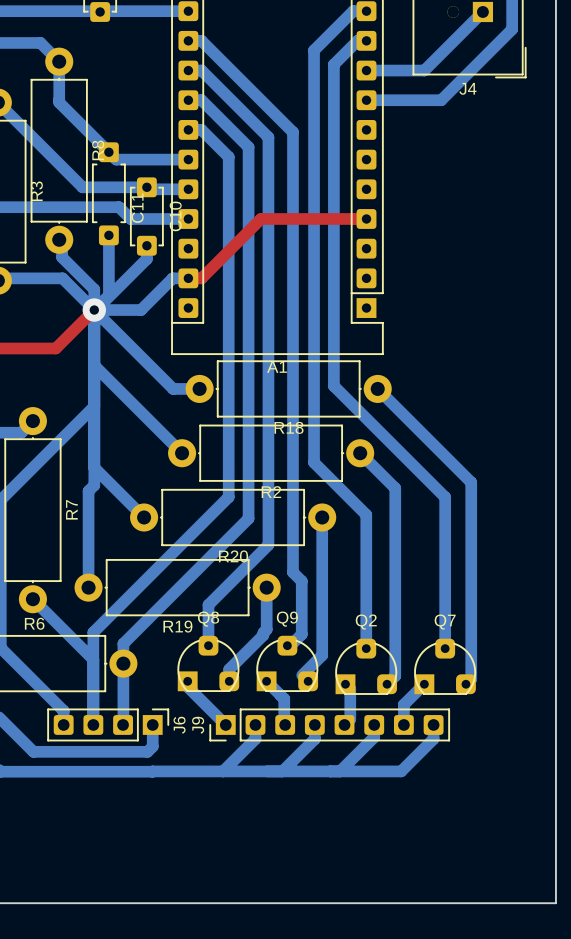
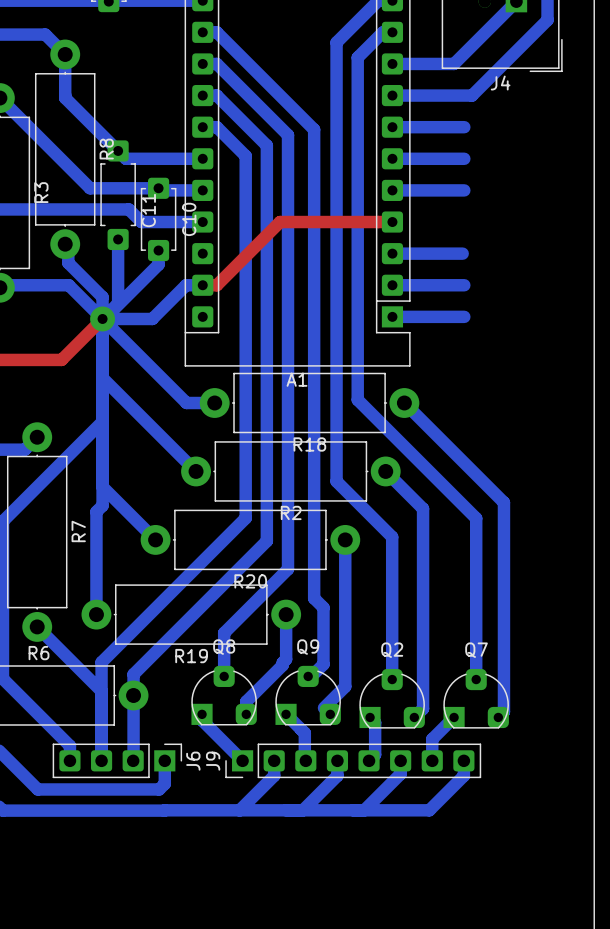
bottom track: none -> (392, 127) (464, 127)
bottom track: none -> (392, 158) (464, 158)
bottom track: none -> (392, 190) (464, 190)
bottom track: none -> (392, 253) (462, 253)
bottom track: none -> (392, 285) (464, 285)
bottom track: none -> (392, 316) (464, 316)

